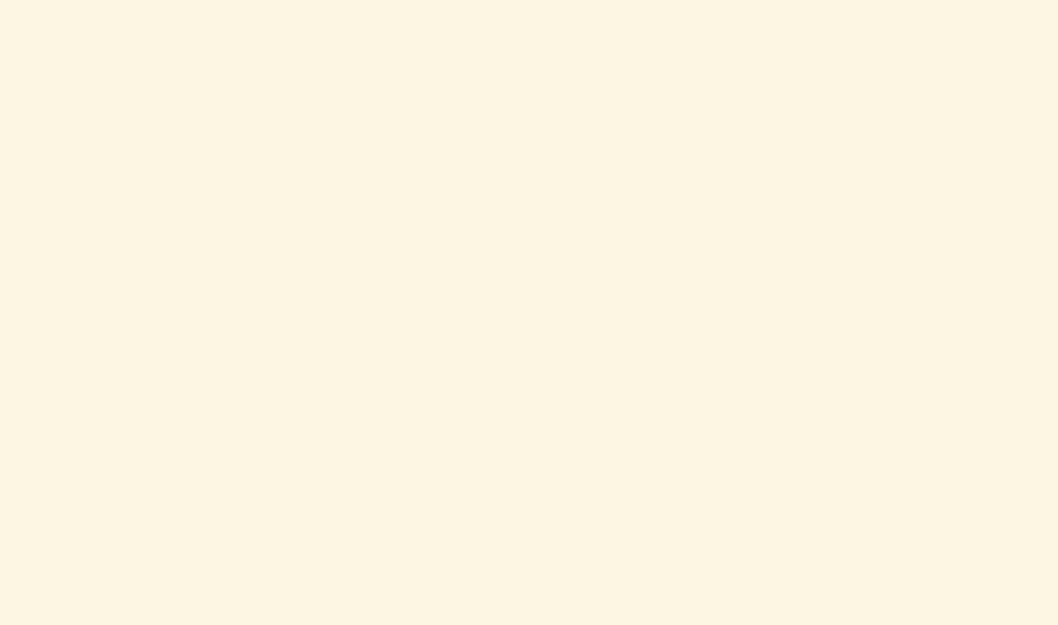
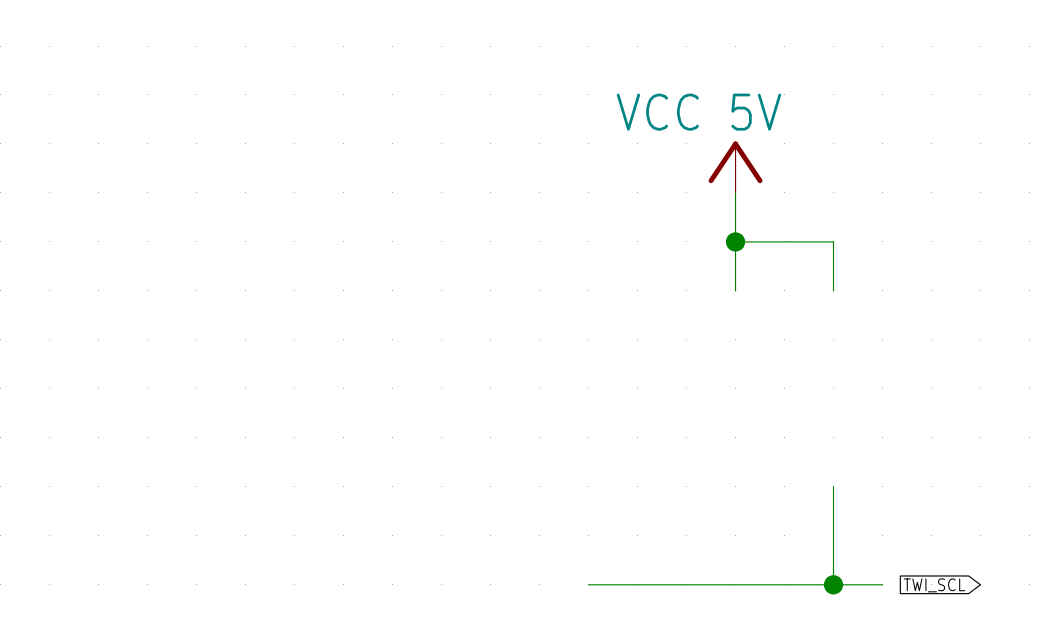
power symbol: none -> VCC 5V (735, 167)
wire: none -> (735, 192) (735, 290)
wire: none -> (735, 241) (833, 241) (833, 290)
junction: none -> (735, 241)
wire: none -> (833, 486) (833, 584)
wire: none -> (588, 584) (882, 584)
junction: none -> (833, 584)
global label: none -> TWI_SCL (934, 585)

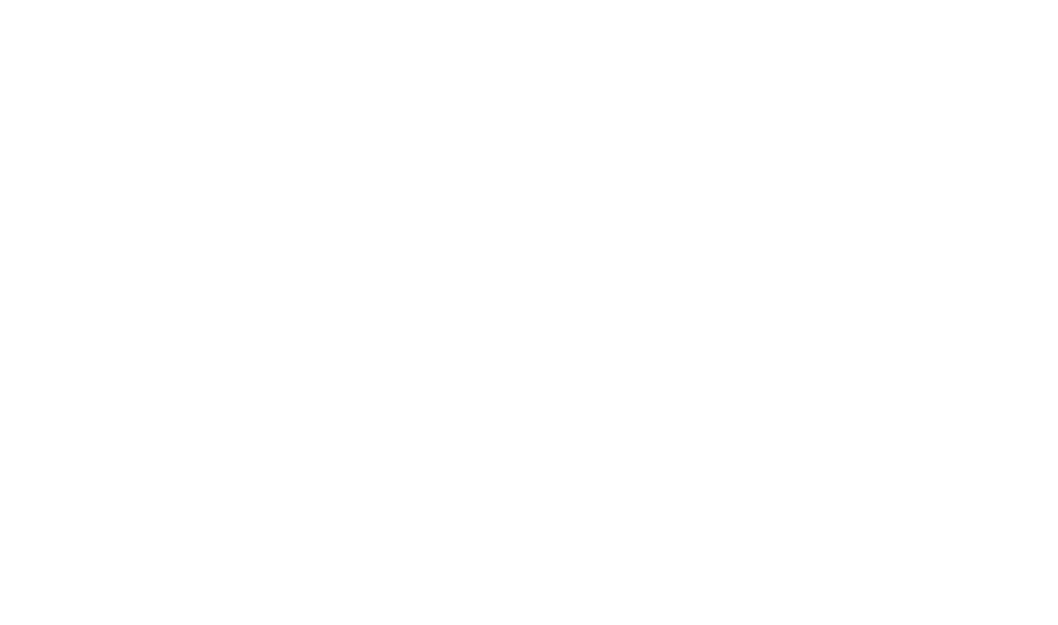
power symbol: VCC 5V (735, 167) -> none
wire: (735, 192) (735, 290) -> none
wire: (735, 241) (833, 241) (833, 290) -> none
junction: (735, 241) -> none
wire: (833, 486) (833, 584) -> none
wire: (588, 584) (882, 584) -> none
junction: (833, 584) -> none
global label: TWI_SCL (934, 585) -> none

